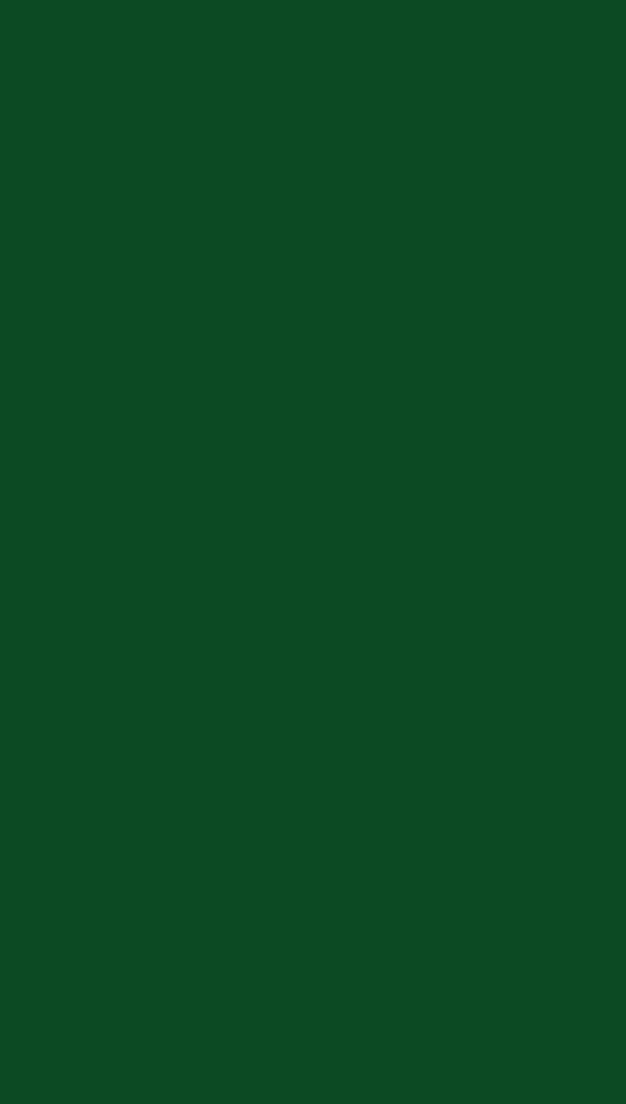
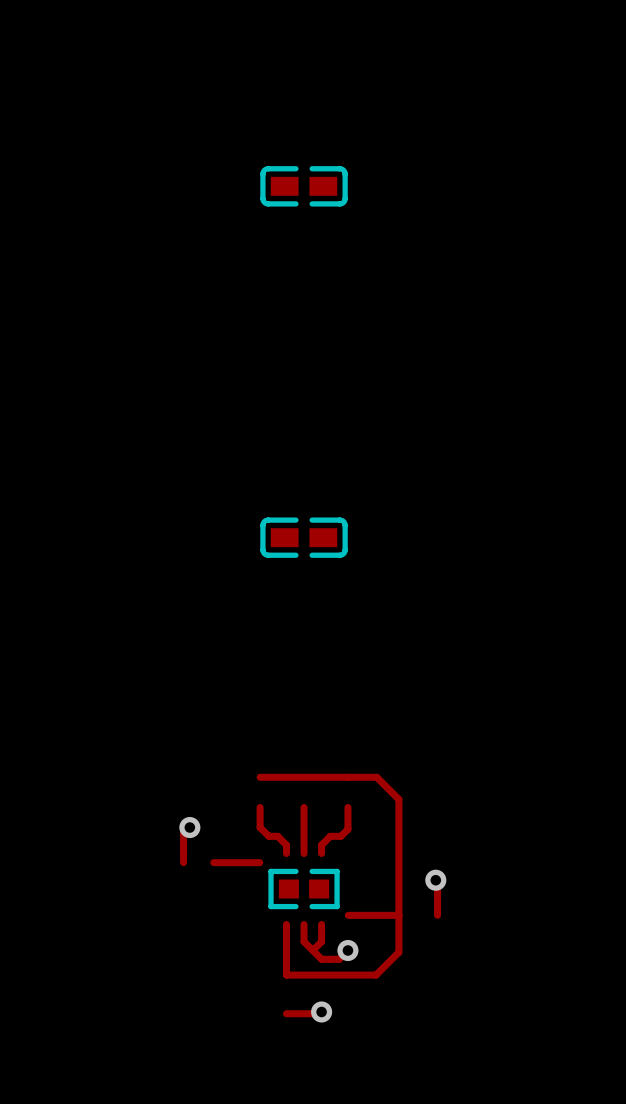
part: none -> (304, 186)
part: none -> (304, 537)
track: none -> (260, 777) (376, 777) (398, 799) (398, 952) (376, 975) (286, 975) (286, 924)
track: none -> (260, 807) (260, 827) (268, 836) (277, 836) (286, 845) (286, 853)
track: none -> (304, 807) (304, 853)
track: none -> (347, 807) (347, 829) (340, 836) (330, 836) (321, 845) (321, 853)
track: none -> (189, 827) (183, 833) (183, 862)
via: none -> (189, 827)
track: none -> (213, 862) (259, 862)
track: none -> (435, 880) (437, 881) (437, 915)
via: none -> (435, 880)
part: none -> (304, 889)
track: none -> (348, 915) (398, 915)
track: none -> (304, 924) (304, 941) (321, 959) (339, 959) (347, 950)
track: none -> (321, 924) (321, 941) (312, 950)
via: none -> (347, 950)
track: none -> (321, 1011) (319, 1013) (286, 1013)
via: none -> (321, 1011)

